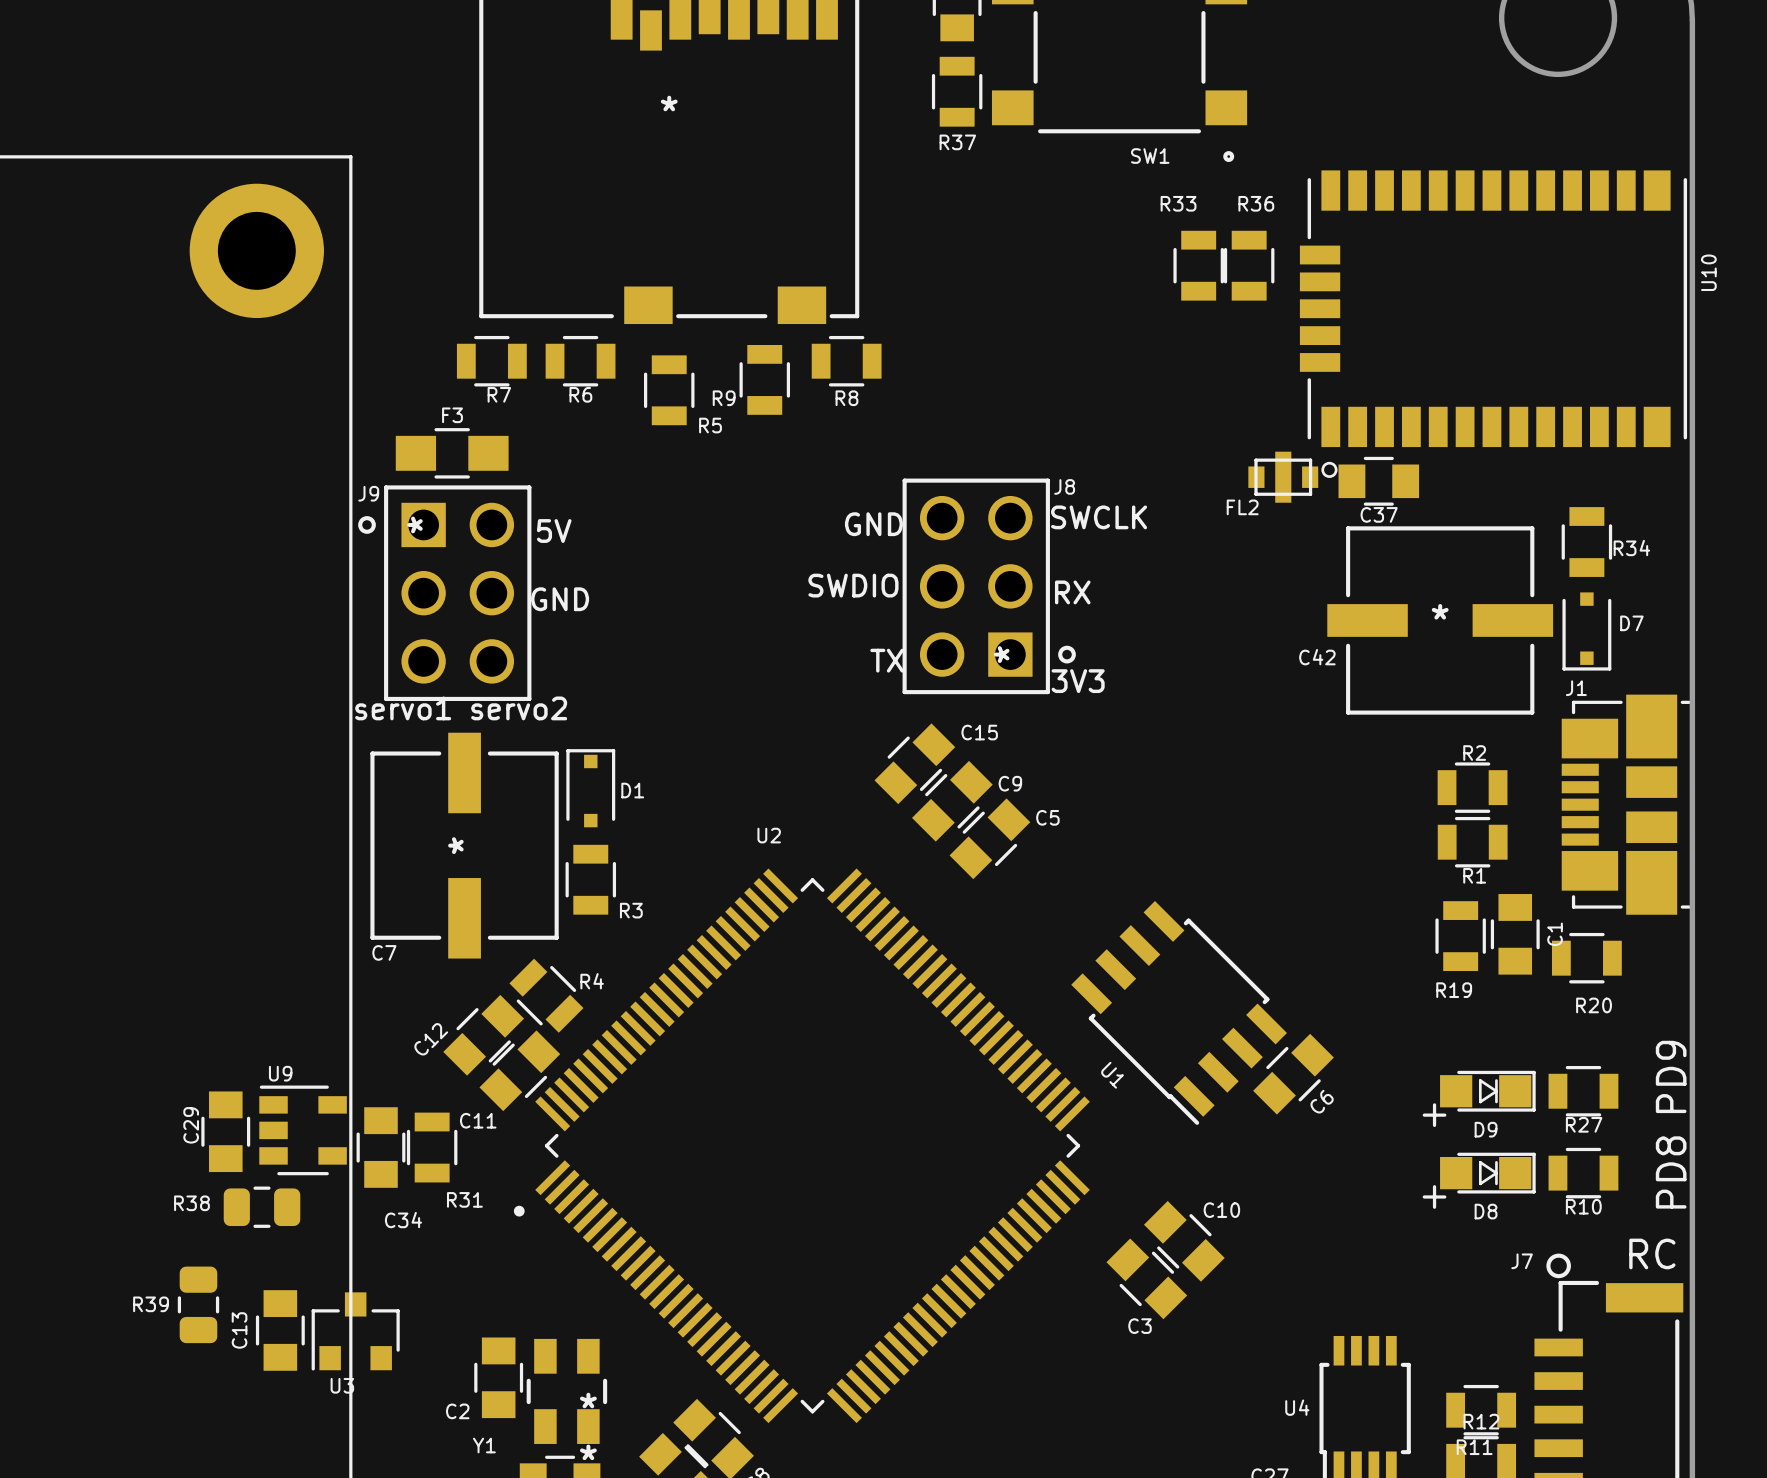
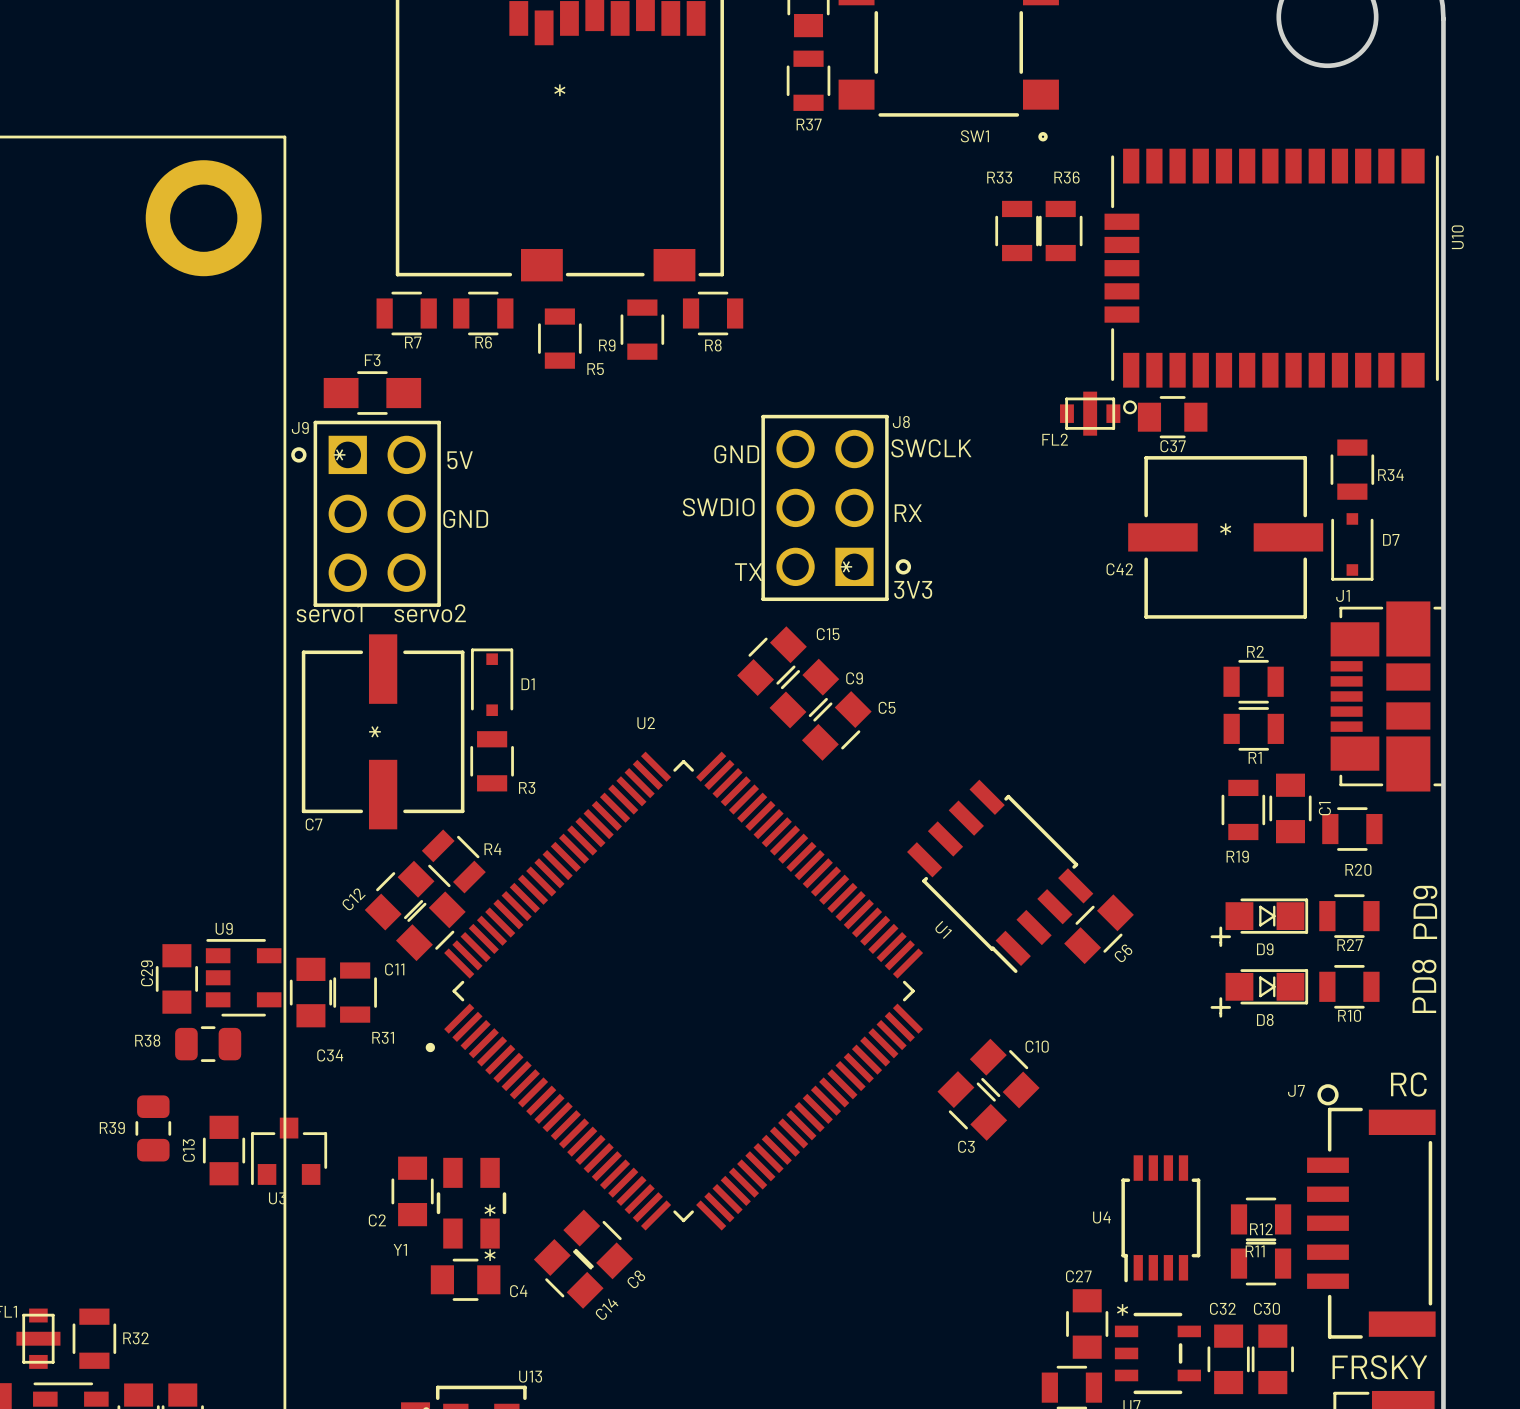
text position: PD9 (1671, 1076) -> PD9 (1425, 912)
R27 position: (1583, 1091) -> (1349, 916)
D9 position: (1479, 1098) -> (1259, 922)
text position: PD8 (1671, 1172) -> PD8 (1424, 986)
R10 position: (1583, 1173) -> (1349, 986)
D8 position: (1479, 1180) -> (1259, 993)

